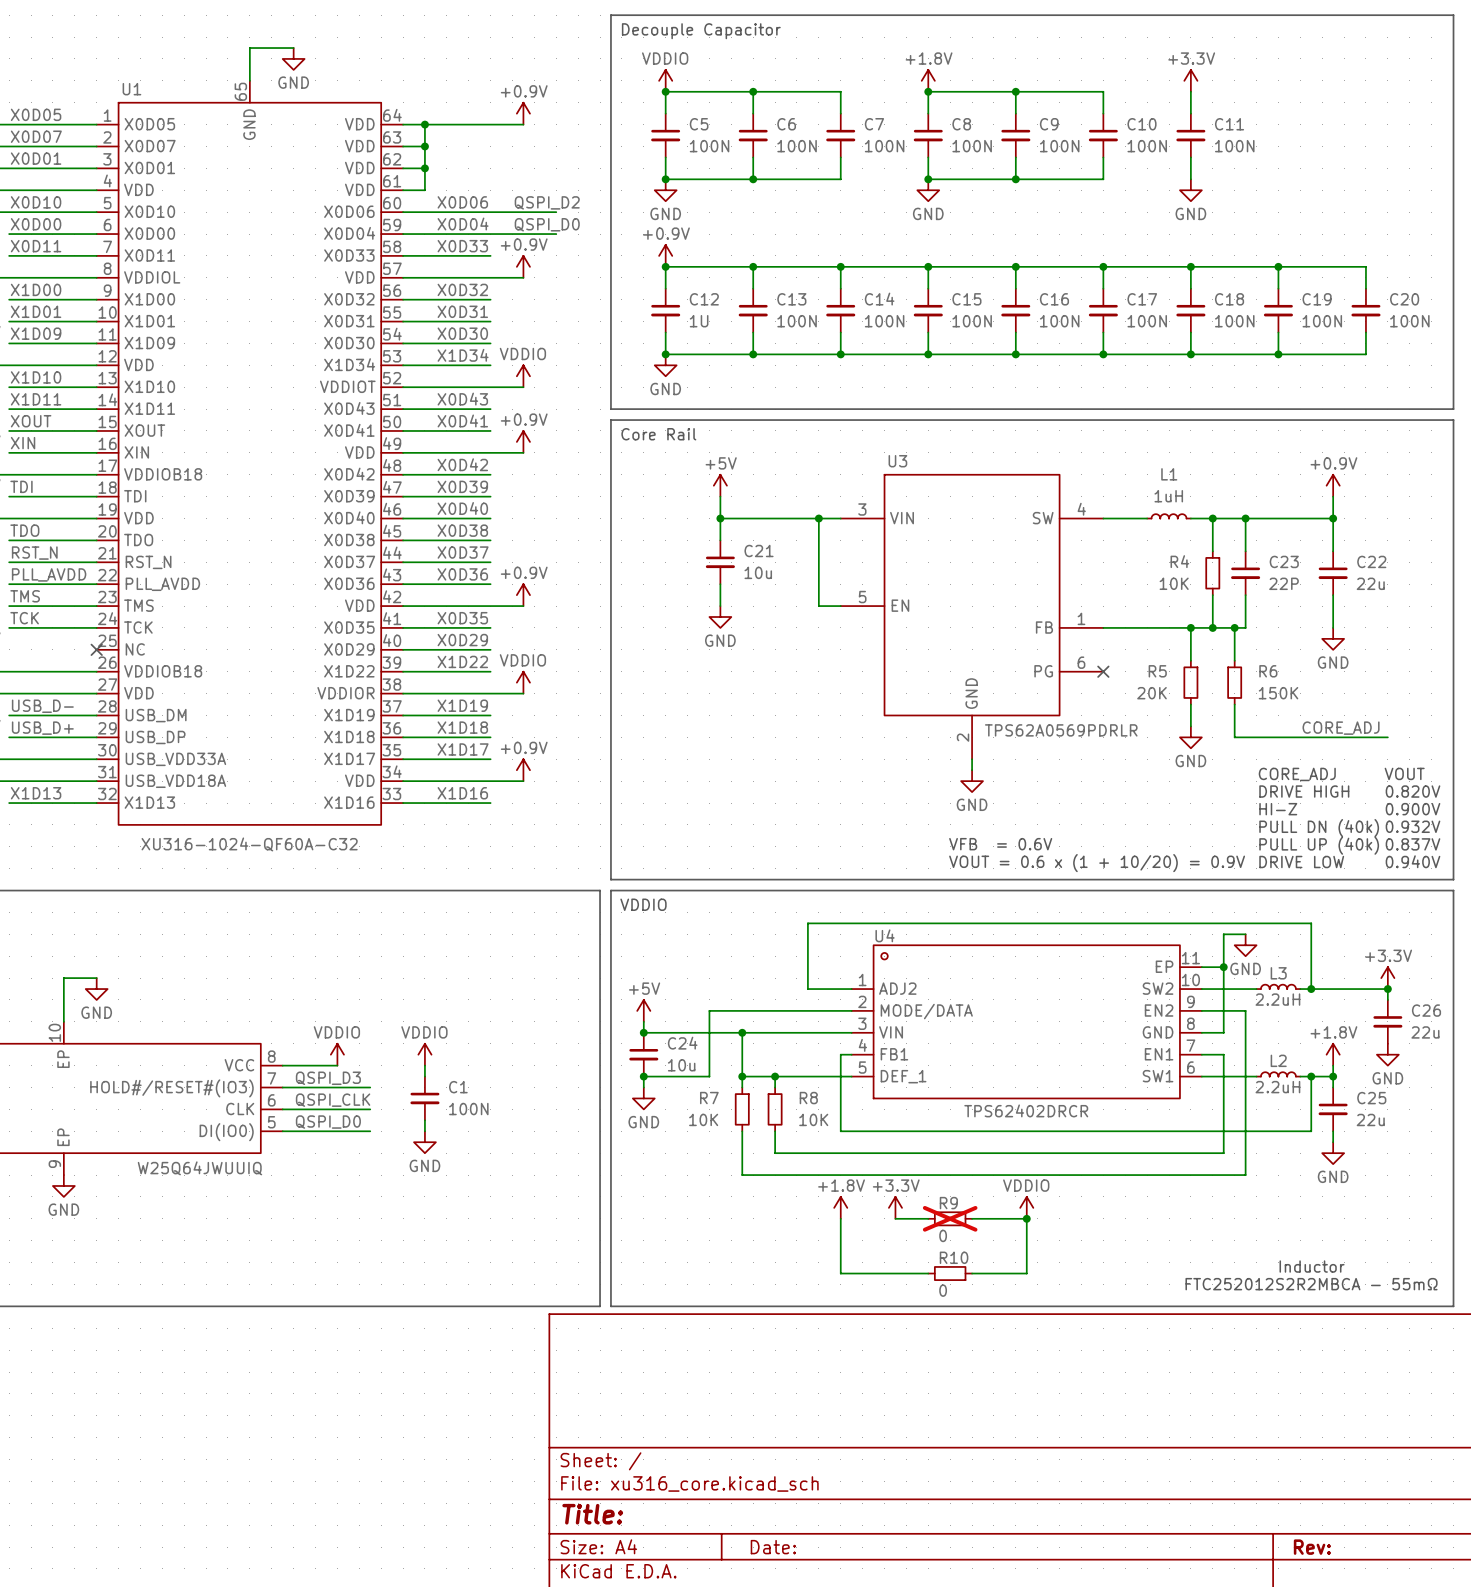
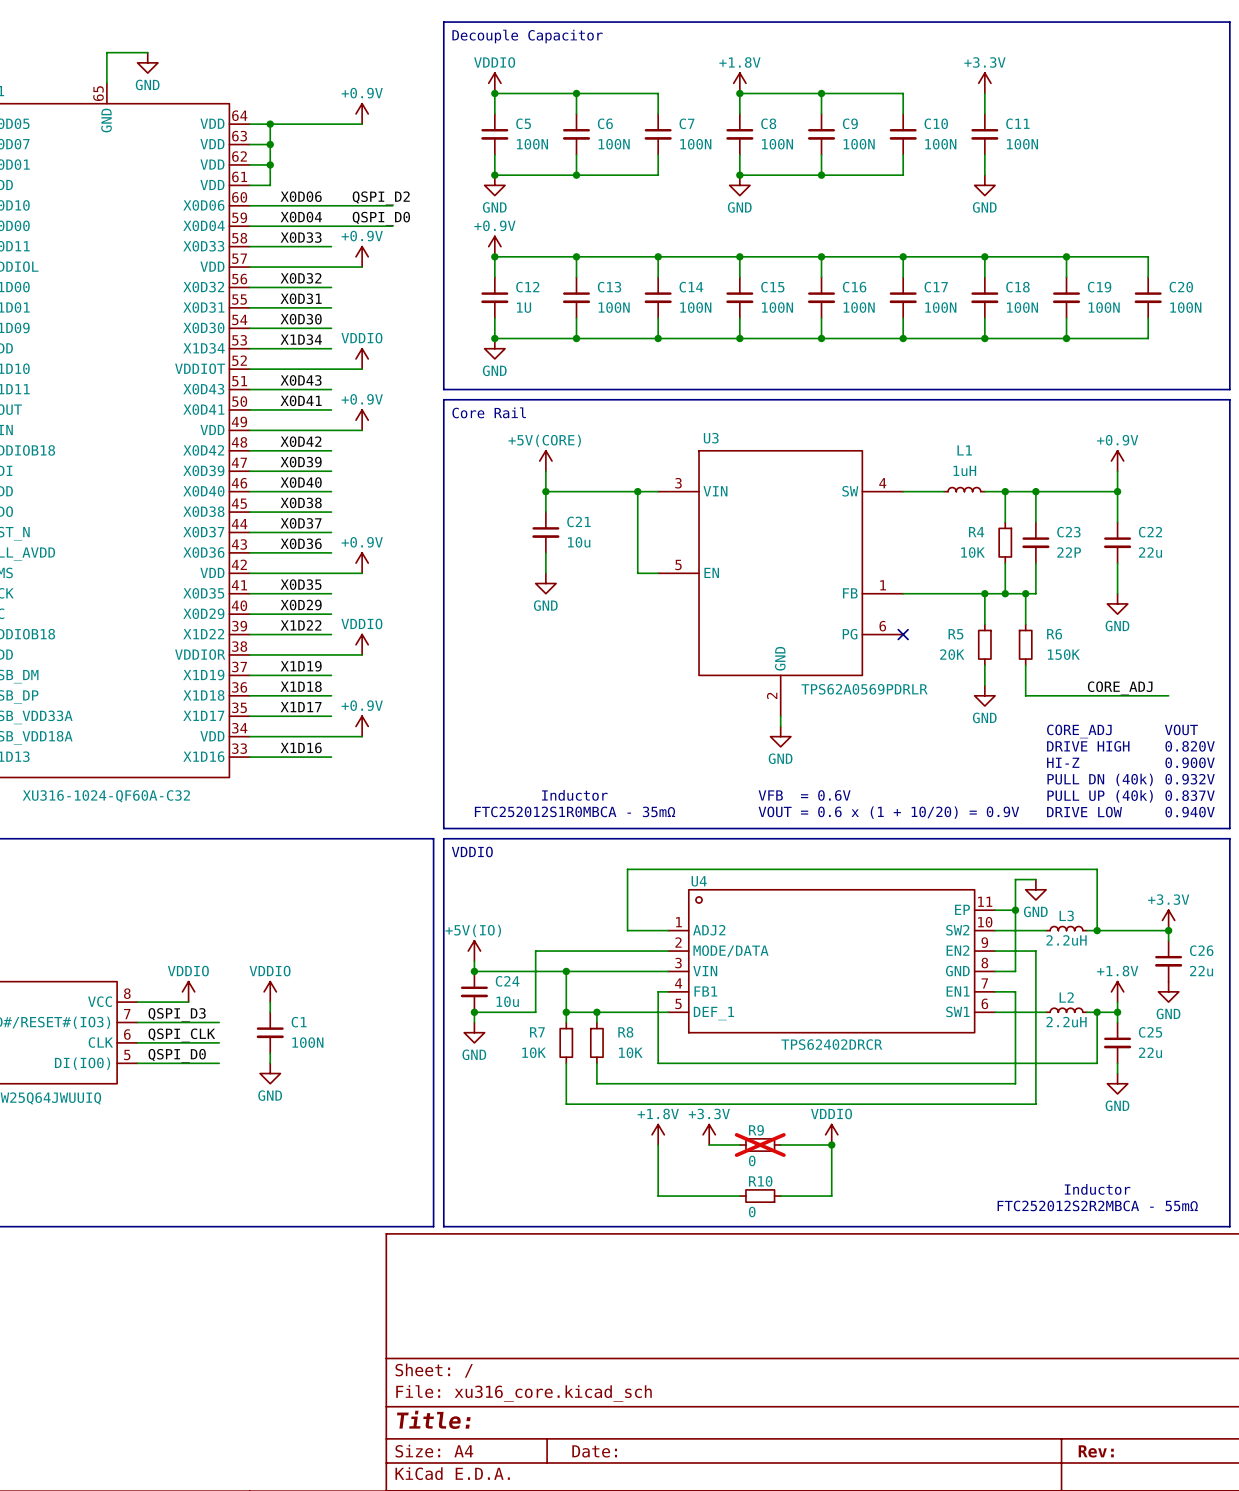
power symbol: +5V (720, 485) -> +5V(CORE) (545, 461)
text: none -> Inductor (574, 795)
text: none -> FTC252012S1R0MBCA - 35mΩ (575, 811)
power symbol: +5V (643, 1010) -> +5V(IO) (474, 951)

